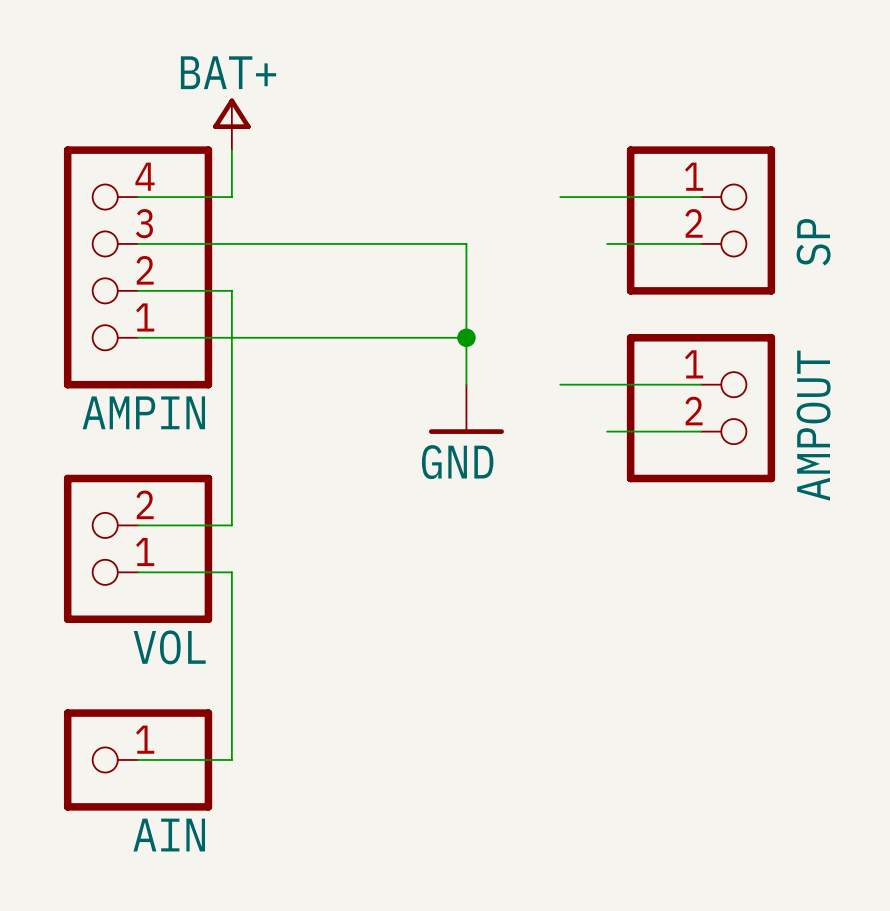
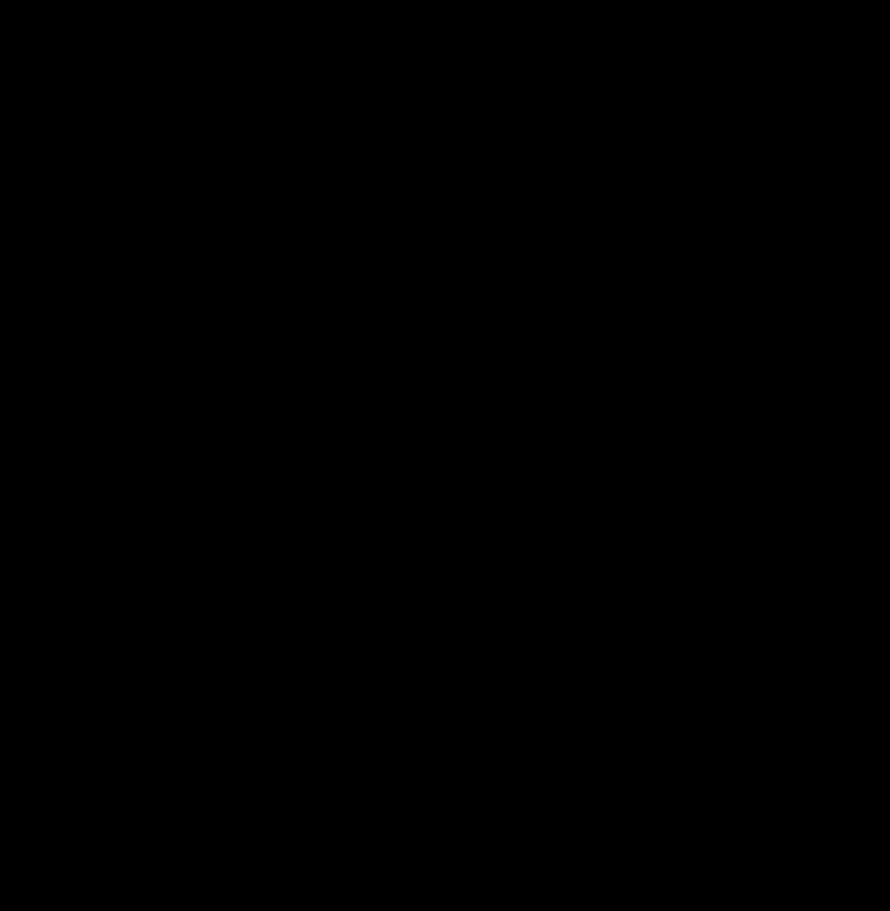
power symbol: BAT+ (231, 124) -> none
wire: (231, 150) (231, 197) (138, 197) -> none
wire: (560, 197) (701, 197) -> none
SP: (701, 220) -> none
wire: (138, 243) (466, 243) (466, 384) -> none
wire: (607, 243) (701, 243) -> none
AMPIN: (138, 267) -> none
wire: (138, 290) (231, 290) (231, 525) (138, 525) -> none
wire: (138, 337) (466, 337) -> none
junction: (466, 337) -> none
wire: (560, 384) (701, 384) -> none
AMPOUT: (701, 408) -> none
power symbol: GND (466, 409) -> none
wire: (607, 431) (701, 431) -> none
VOL: (138, 548) -> none
wire: (138, 572) (231, 572) (231, 759) (138, 759) -> none
AIN: (138, 759) -> none

